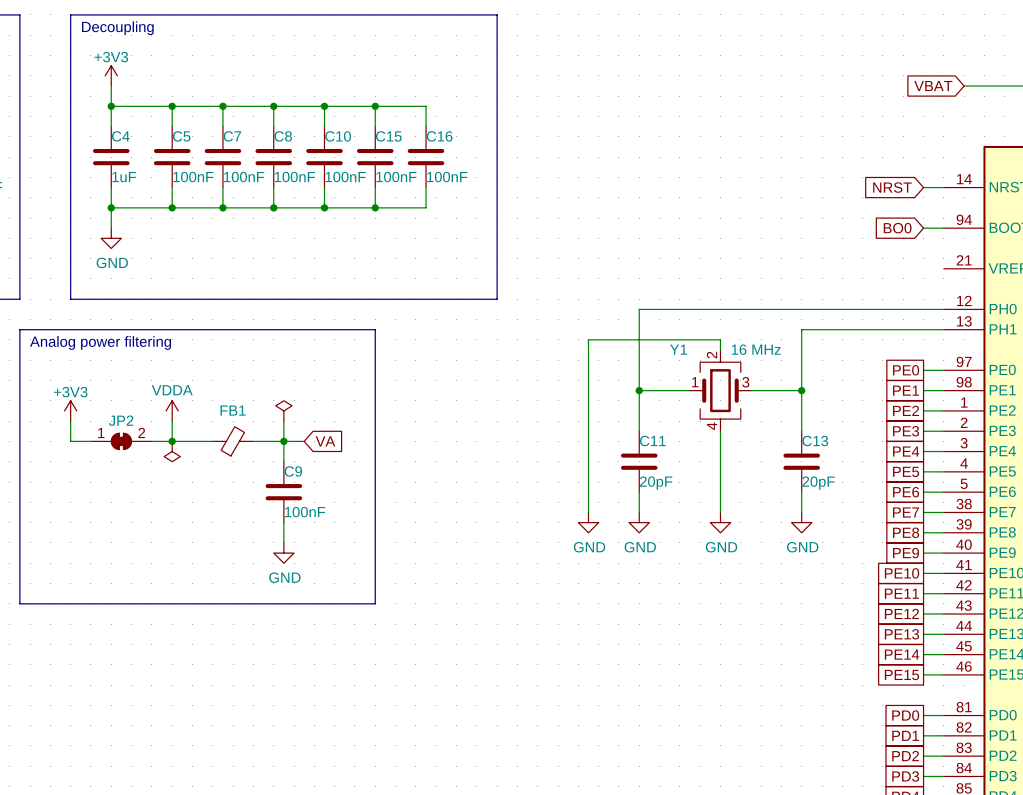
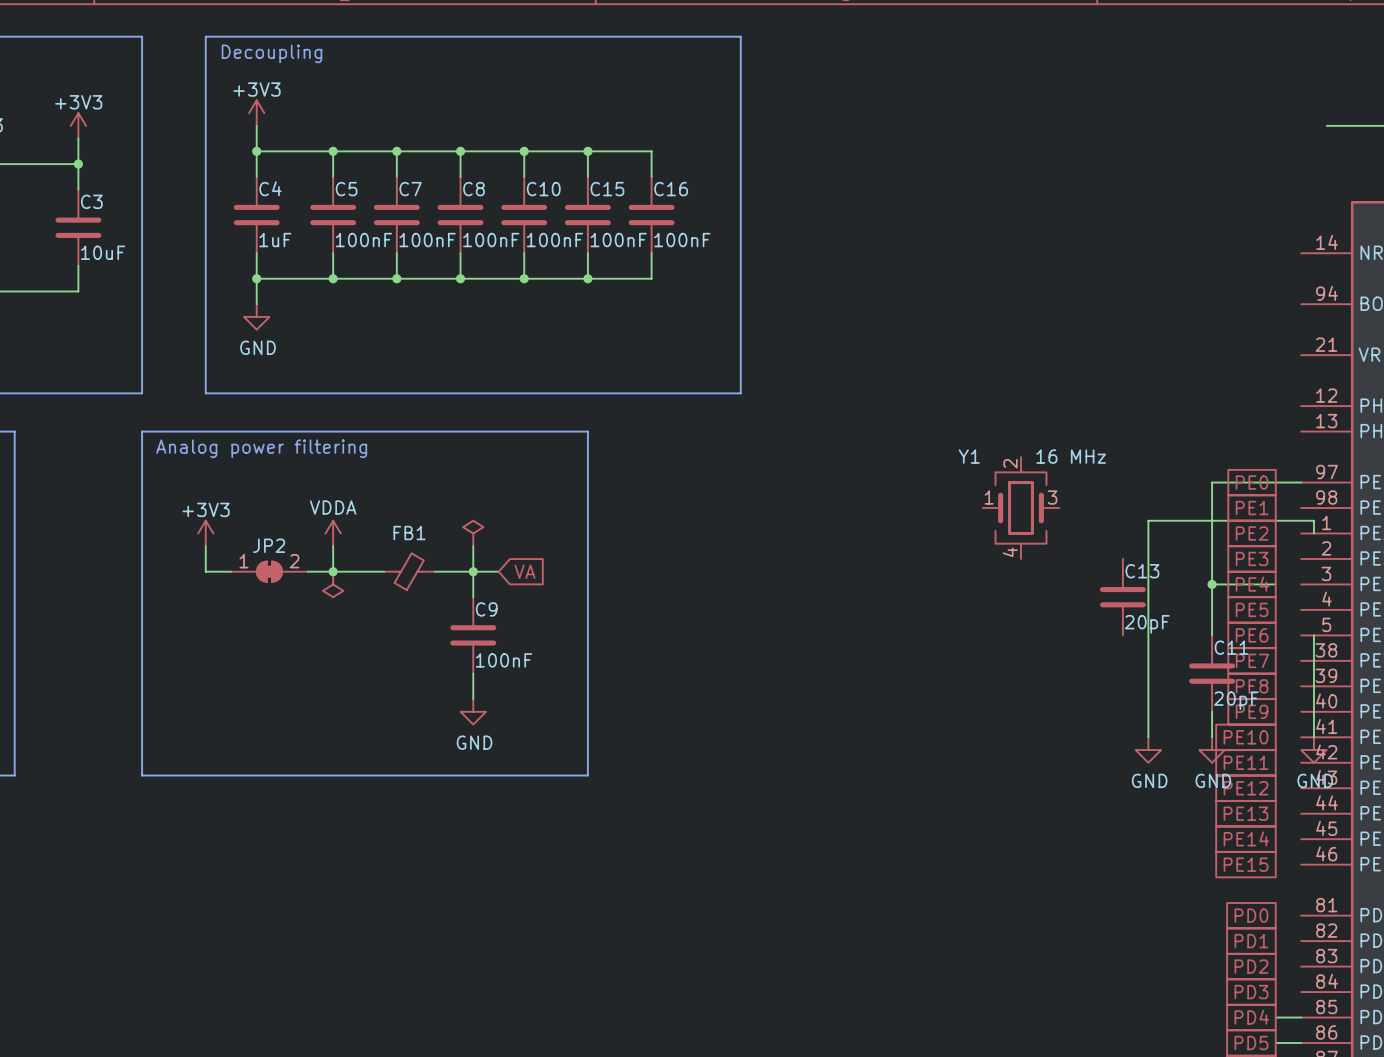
global label: VBAT (933, 86) -> none
global label: NRST (892, 187) -> none
wire: (923, 187) (943, 187) -> none
global label: BO0 (897, 228) -> none
wire: (923, 228) (943, 228) -> none
wire: (943, 309) (639, 309) (639, 431) -> none
wire: (943, 329) (801, 329) (801, 431) -> none
wire: (720, 350) (720, 339) (588, 339) (588, 512) -> none
wire: none -> (1275, 482) (1212, 482) (1212, 635)
wire: (639, 390) (690, 390) -> none
junction: (639, 390) -> none
wire: (750, 390) (801, 390) -> none
junction: (801, 390) -> none
wire: (923, 390) (943, 390) -> none
wire: (923, 410) (943, 410) -> none
wire: none -> (1313, 533) (1313, 520) (1148, 520) (1148, 737)
wire: (720, 431) (720, 512) -> none
wire: (923, 431) (943, 431) -> none
junction: none -> (1212, 584)
wire: (923, 451) (943, 451) -> (1275, 584) (1212, 584)
C11 position: (639, 461) -> (1212, 673)
wire: (923, 471) (943, 471) -> none
wire: (639, 492) (639, 512) -> none
wire: (801, 492) (801, 512) -> (1212, 711) (1212, 737)
wire: (923, 492) (943, 492) -> none
wire: none -> (1313, 635) (1313, 737)
wire: (923, 512) (943, 512) -> none
power symbol: GND (588, 522) -> none
power symbol: GND (639, 522) -> none
power symbol: GND (720, 522) -> none
power symbol: GND (801, 522) -> none
wire: (923, 532) (943, 532) -> none
wire: (923, 553) (943, 553) -> none
wire: (923, 573) (943, 573) -> none
power symbol: none -> GND (1148, 750)
power symbol: none -> GND (1212, 750)
power symbol: none -> GND (1313, 750)
wire: (923, 593) (943, 593) -> none
wire: (923, 614) (943, 614) -> none
wire: (923, 634) (943, 634) -> none
wire: (923, 654) (943, 654) -> none
wire: (923, 674) (943, 674) -> none
wire: (923, 715) (943, 715) -> none
wire: (923, 735) (943, 735) -> none
wire: (923, 756) (943, 756) -> none
wire: (923, 776) (943, 776) -> none

